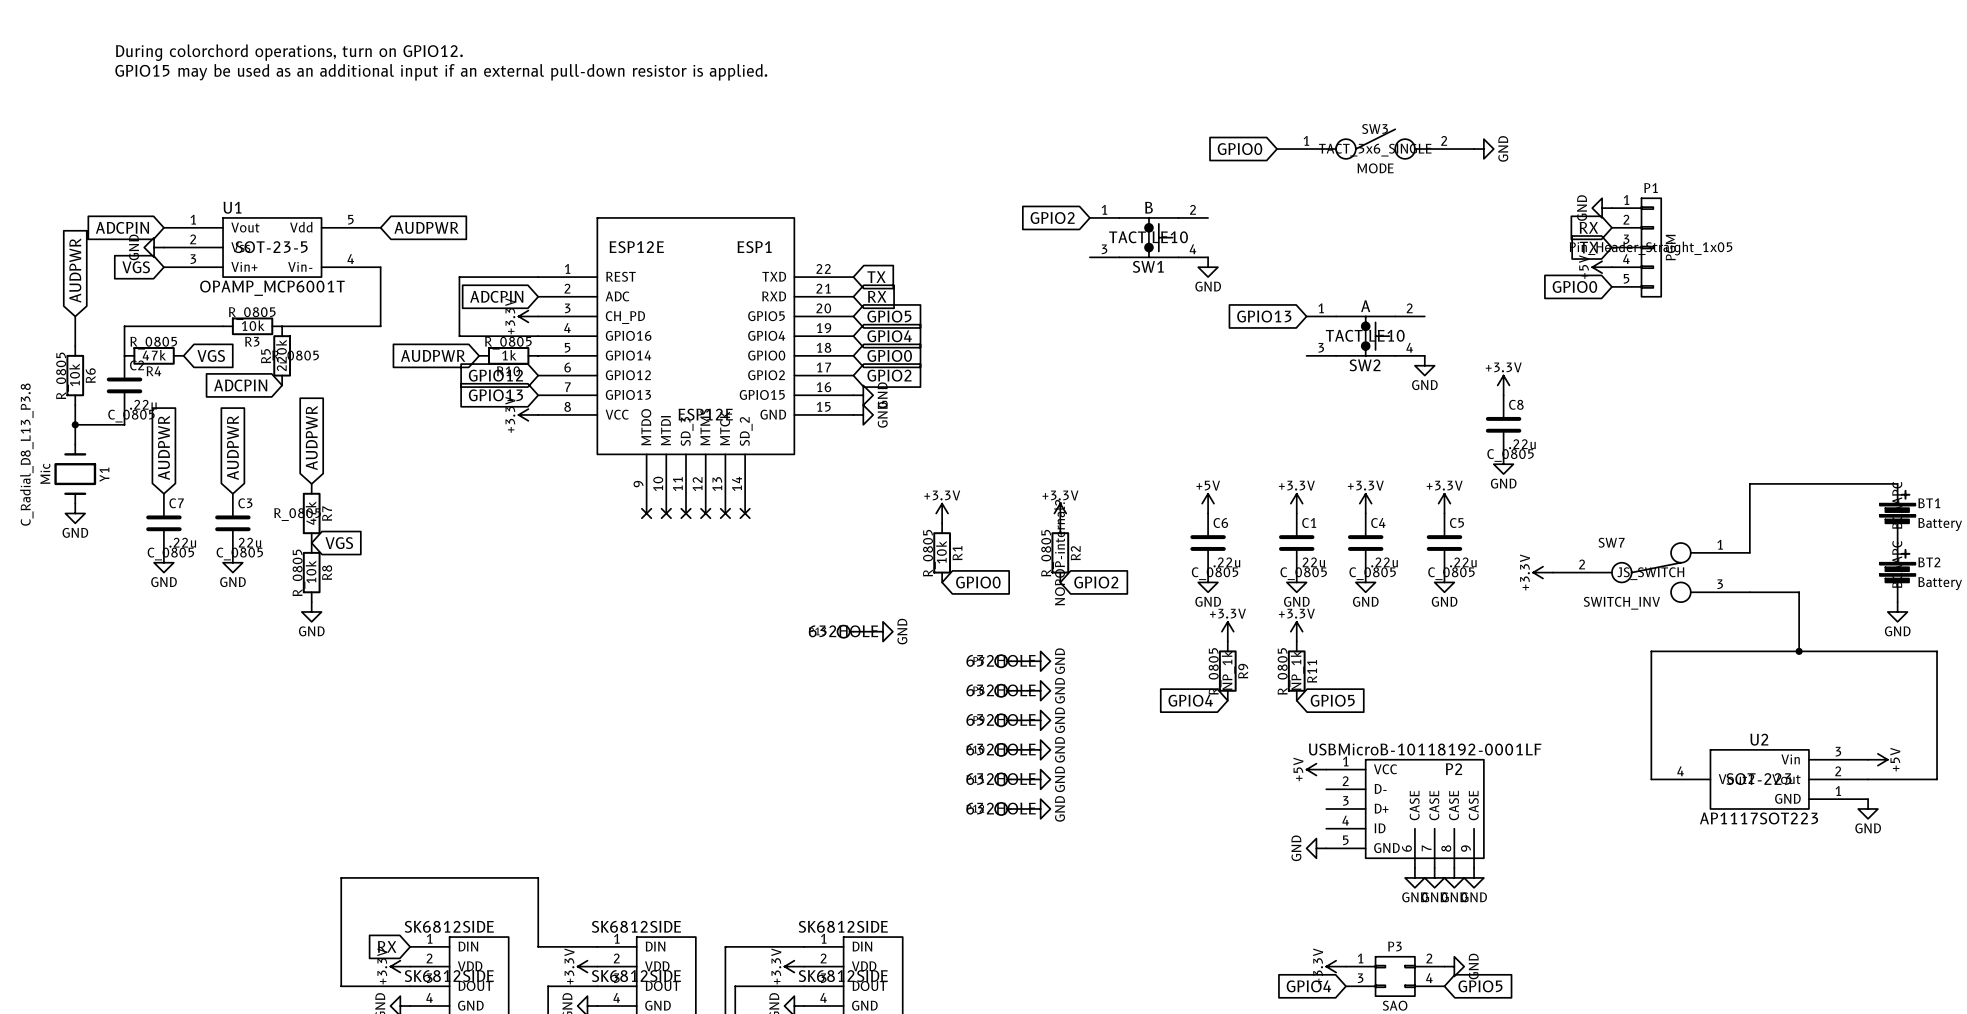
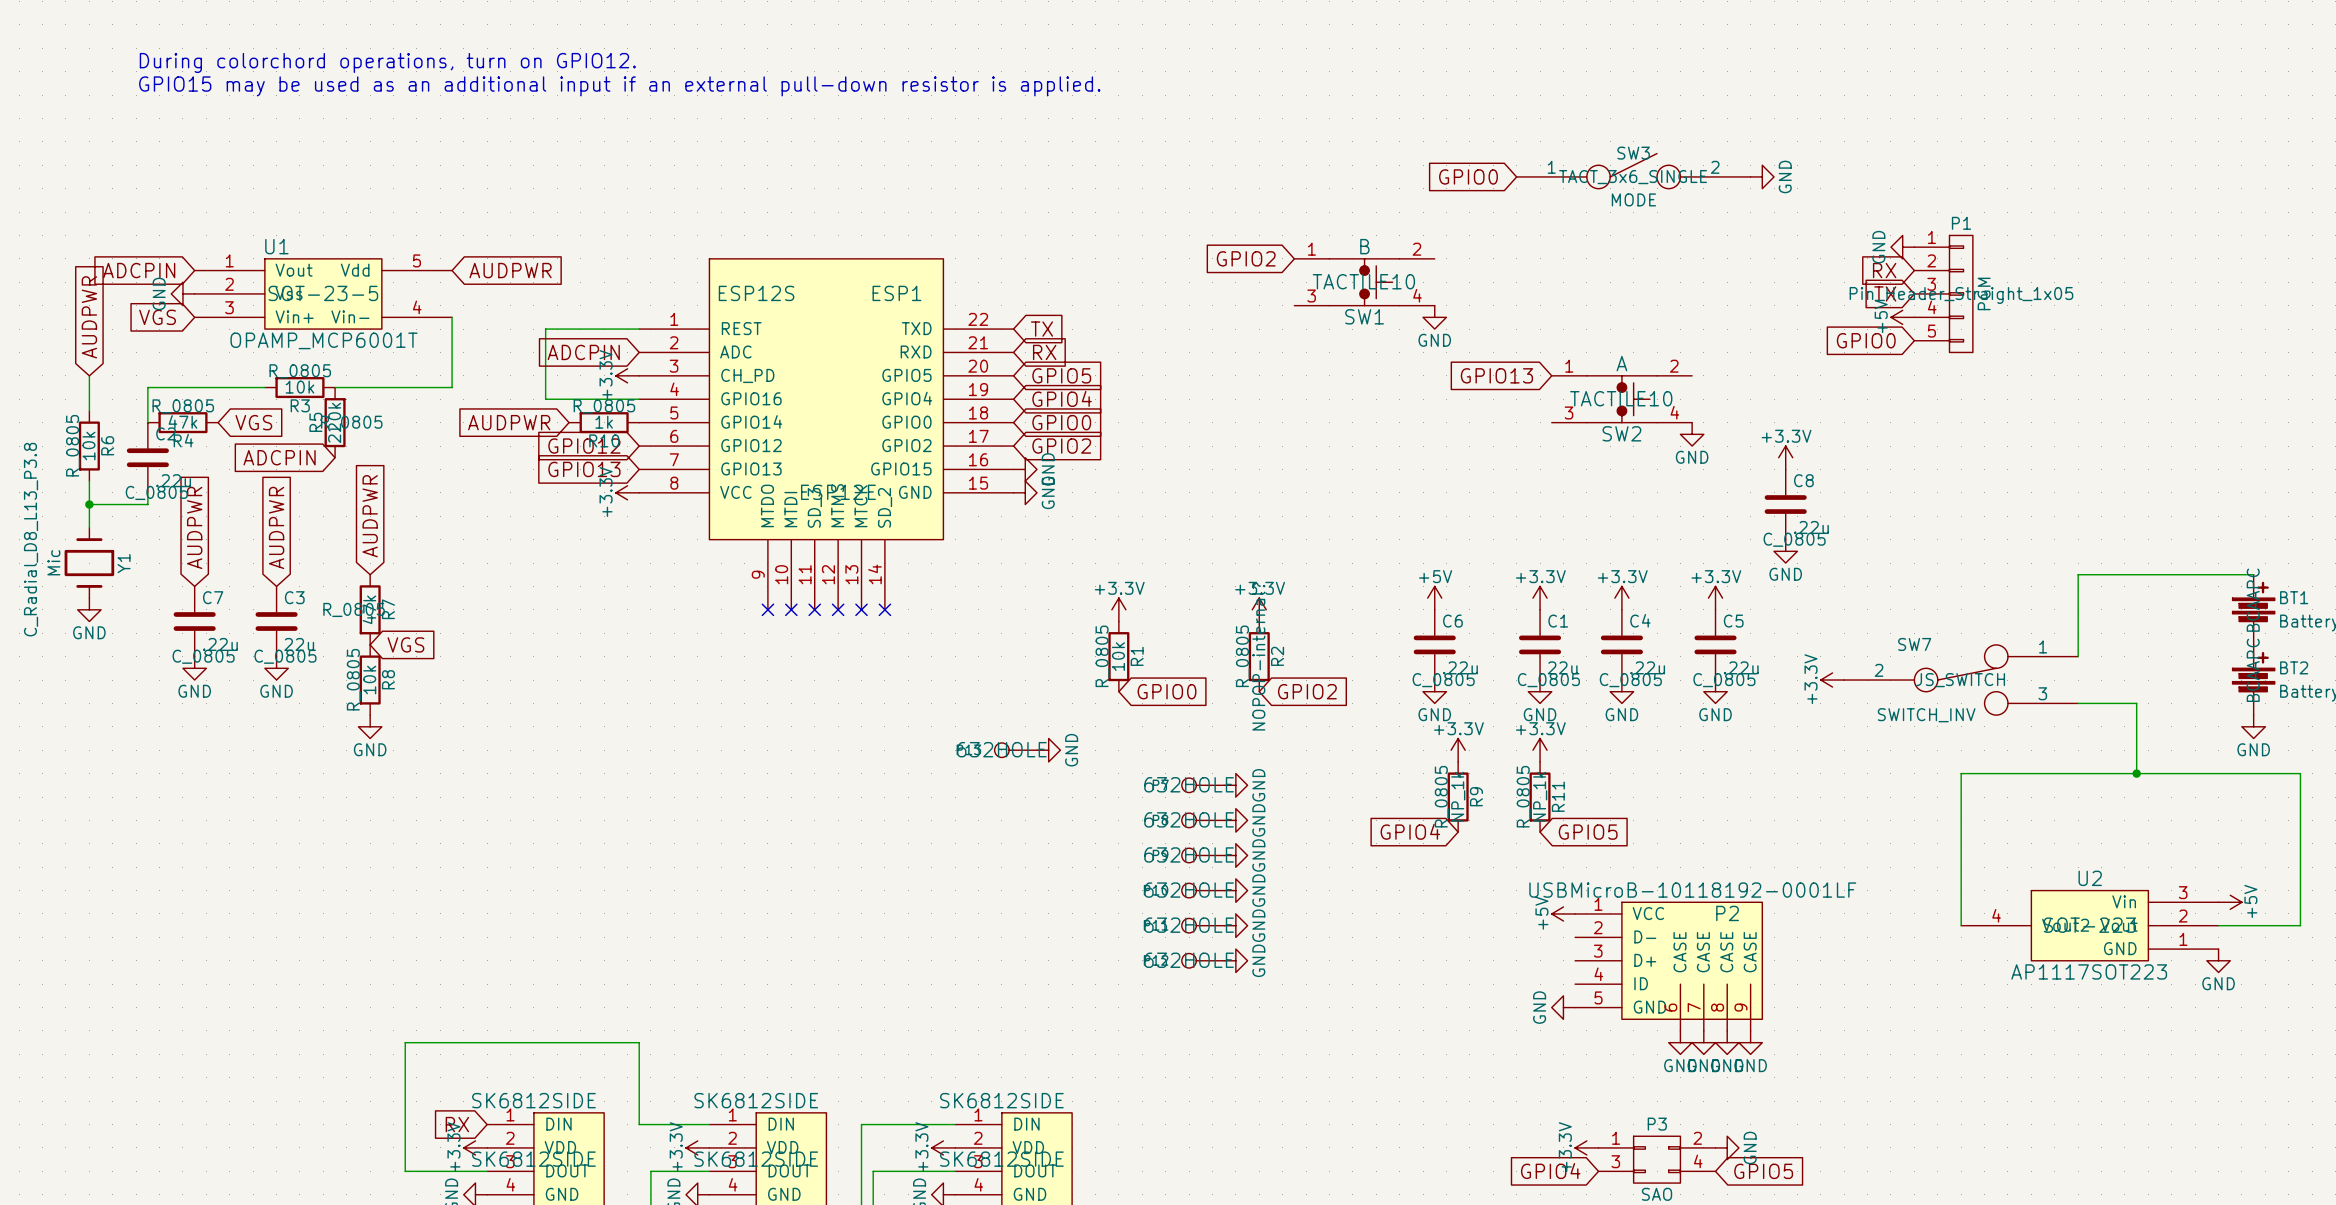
ESP1 value: ESP12E (636, 247) -> ESP12S (756, 293)

